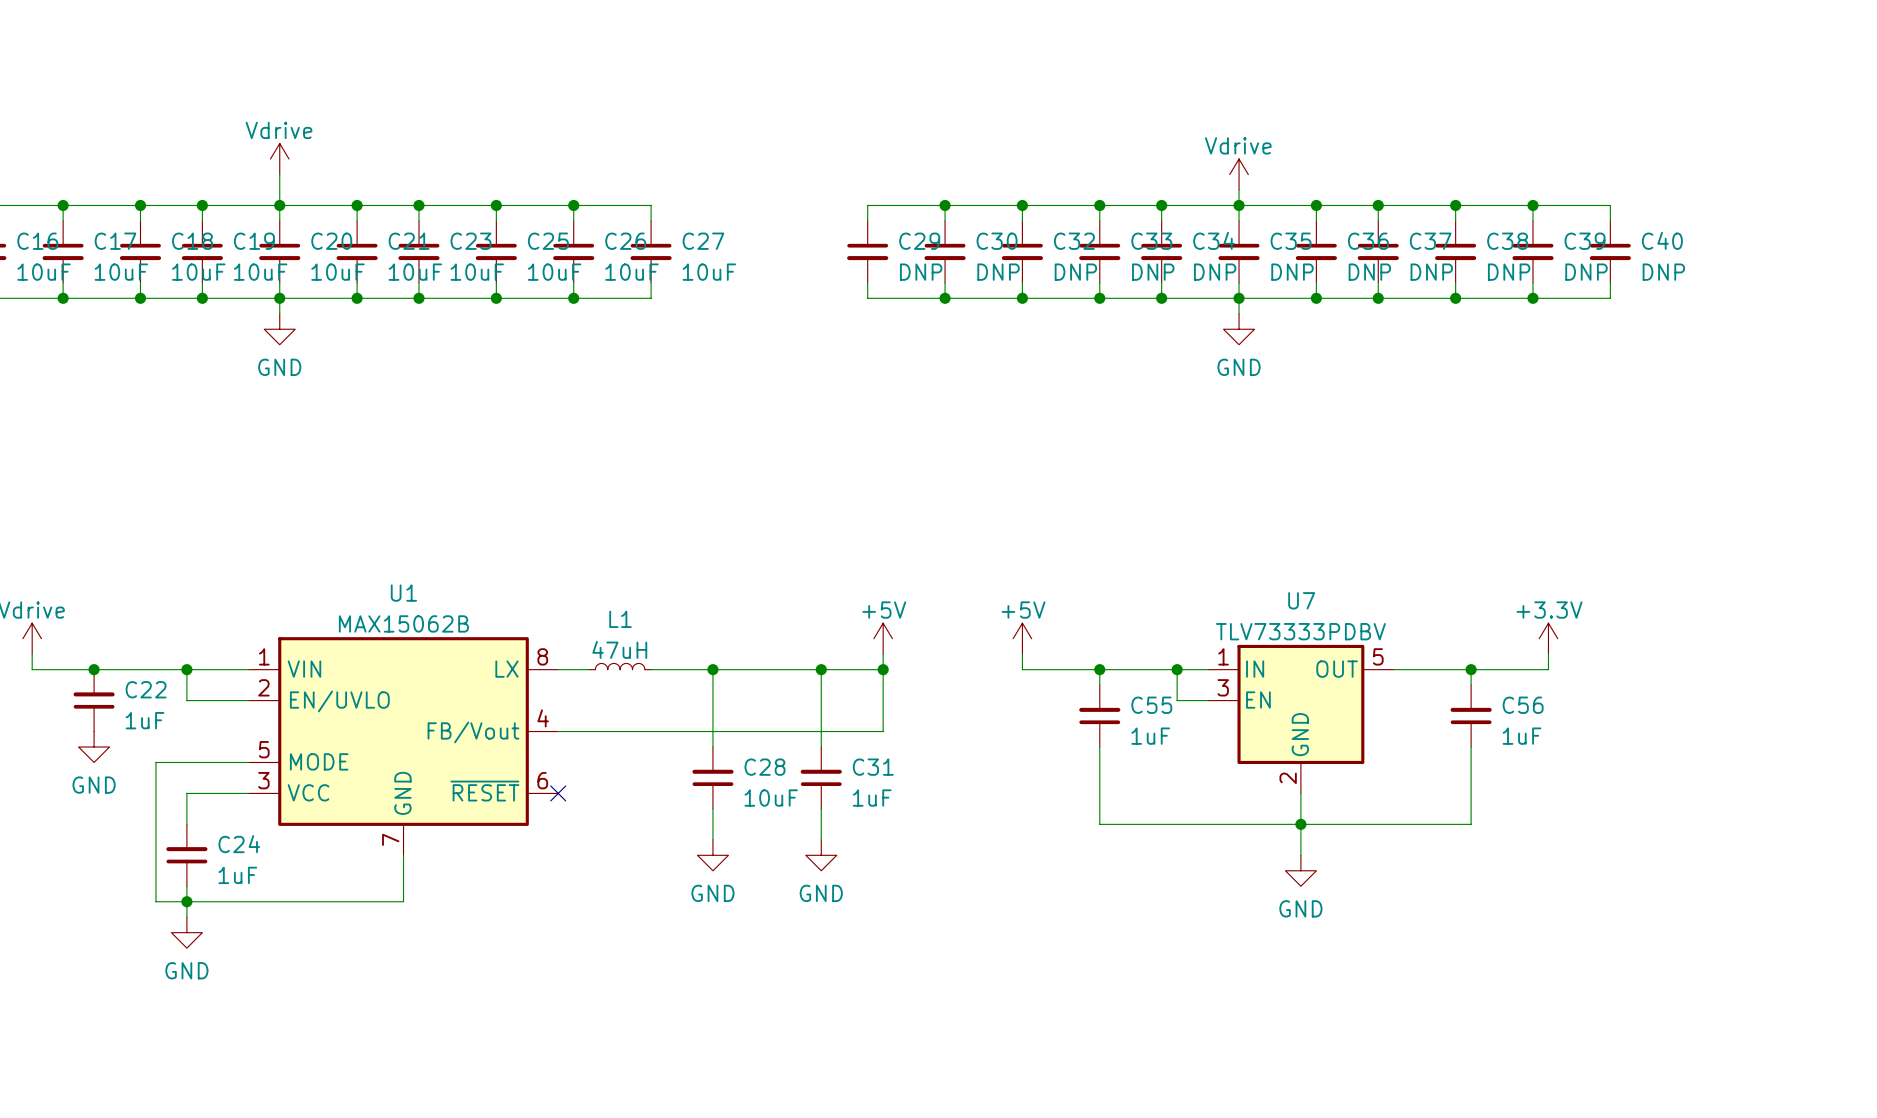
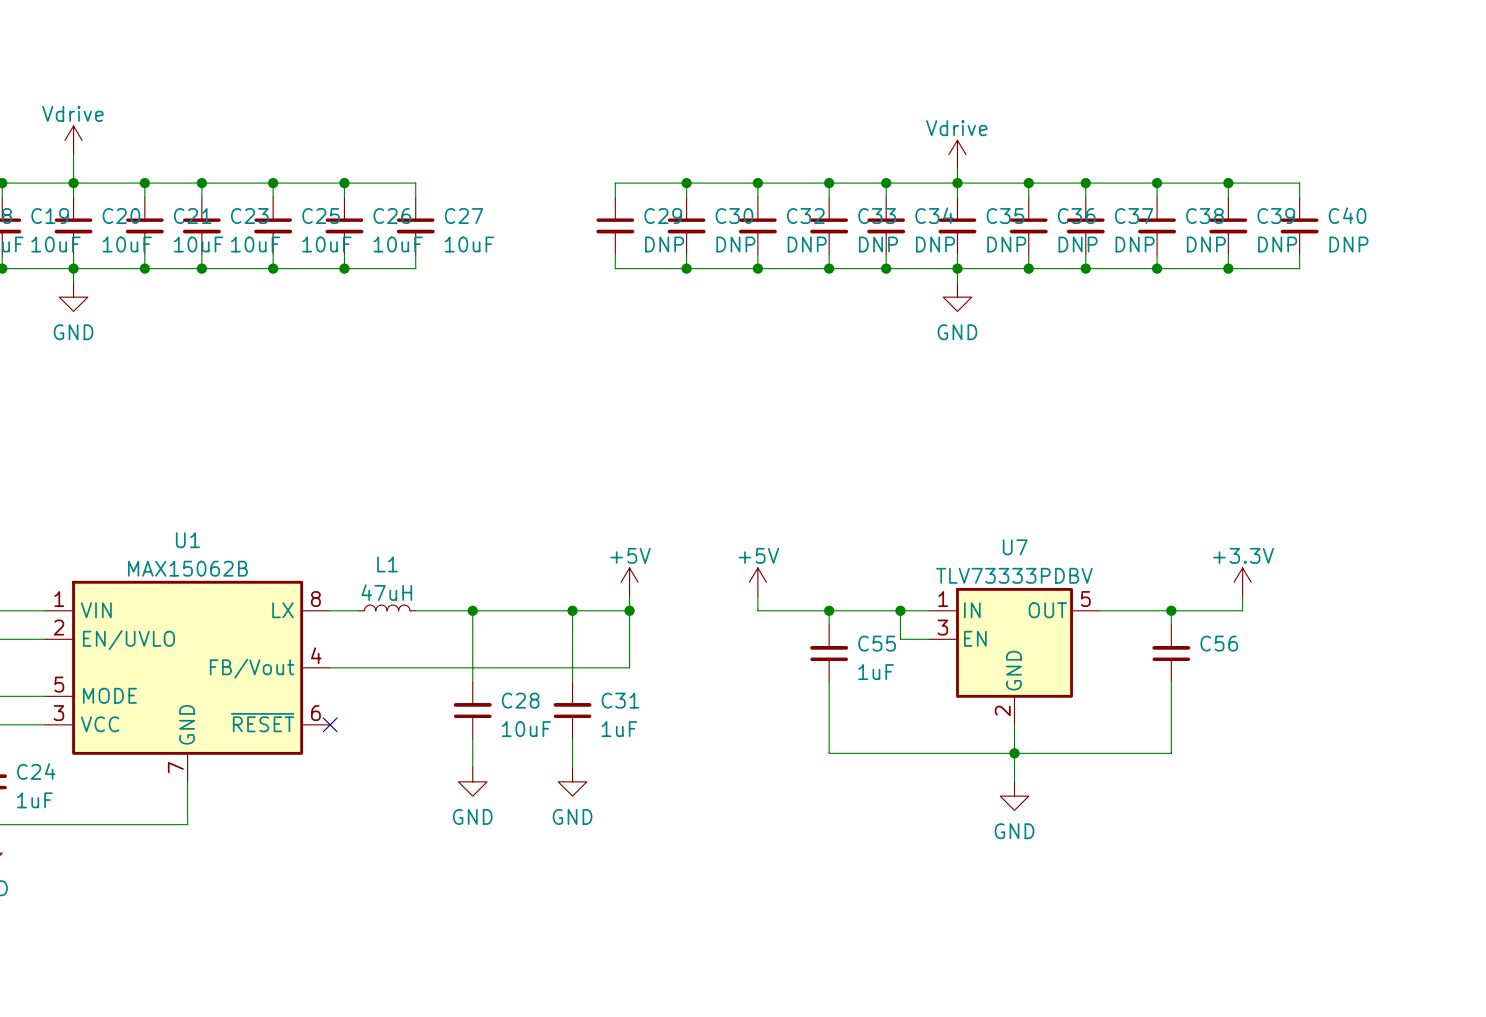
C56 value: 1uF (1522, 736) -> none

